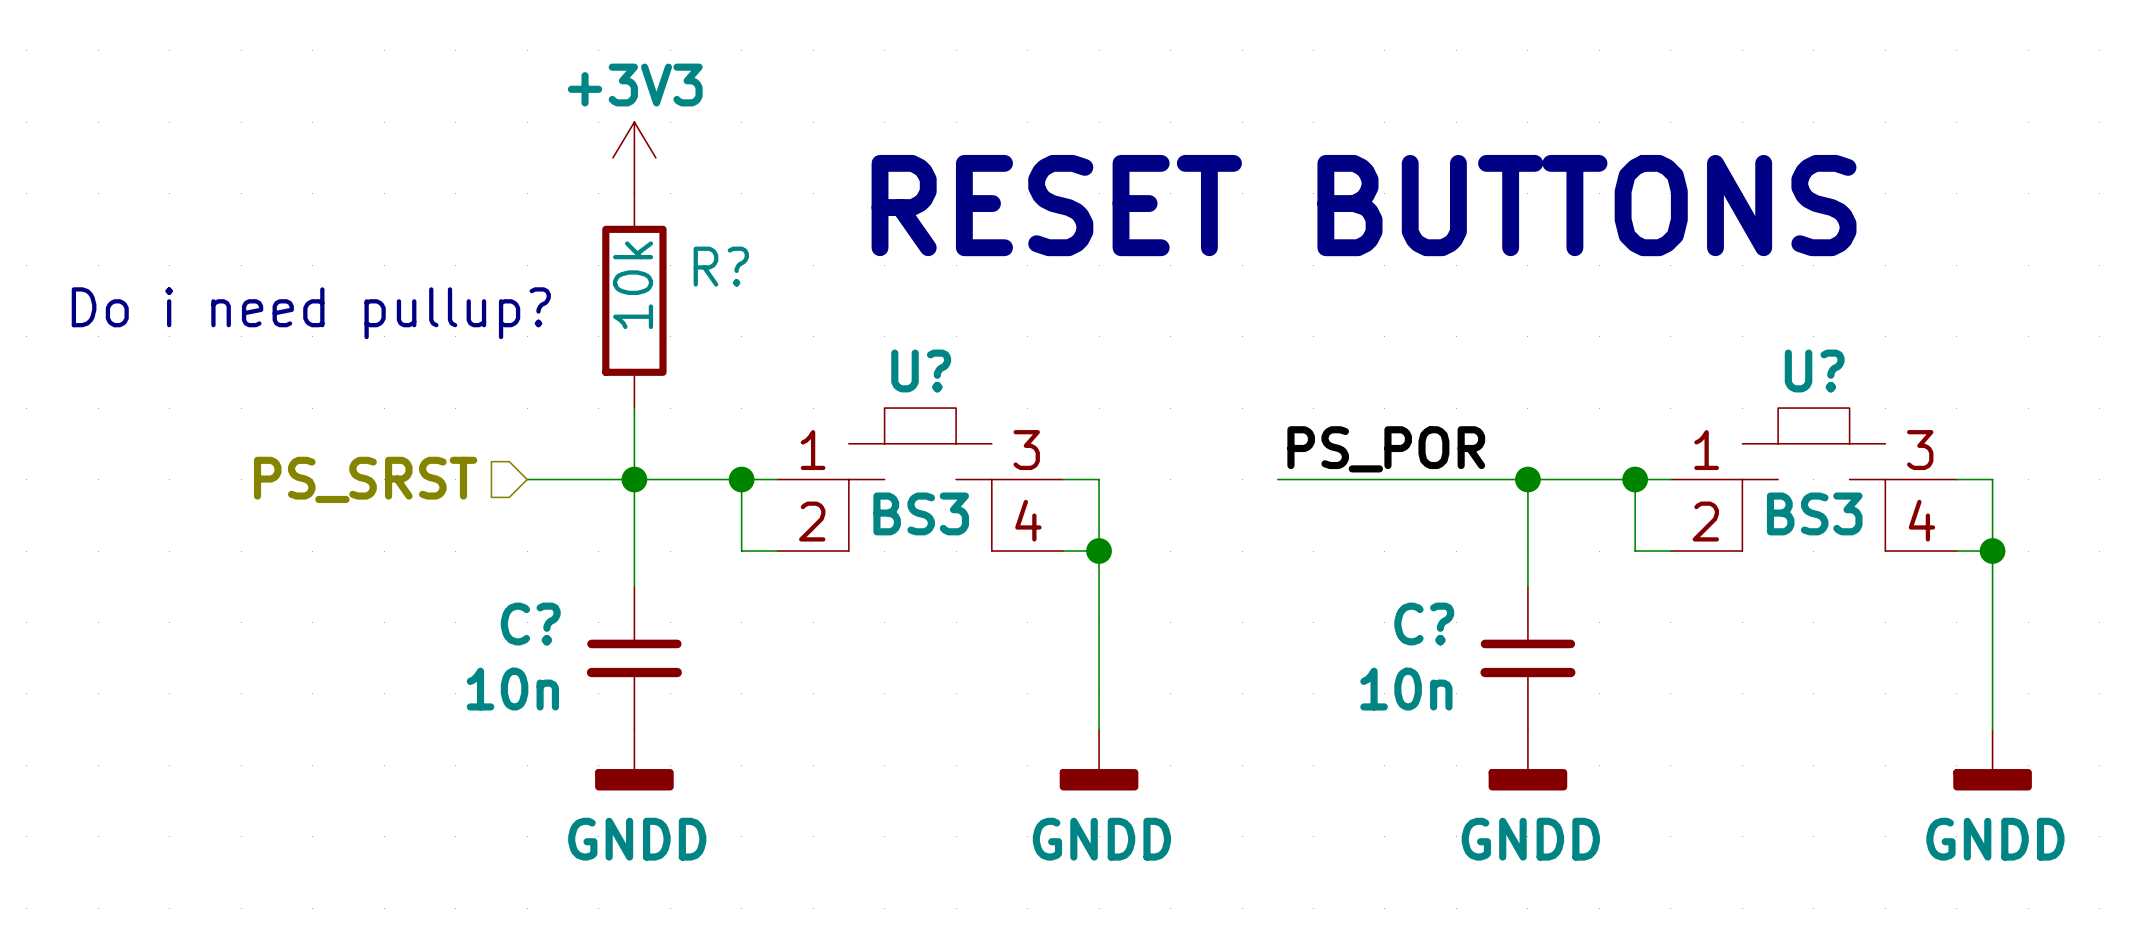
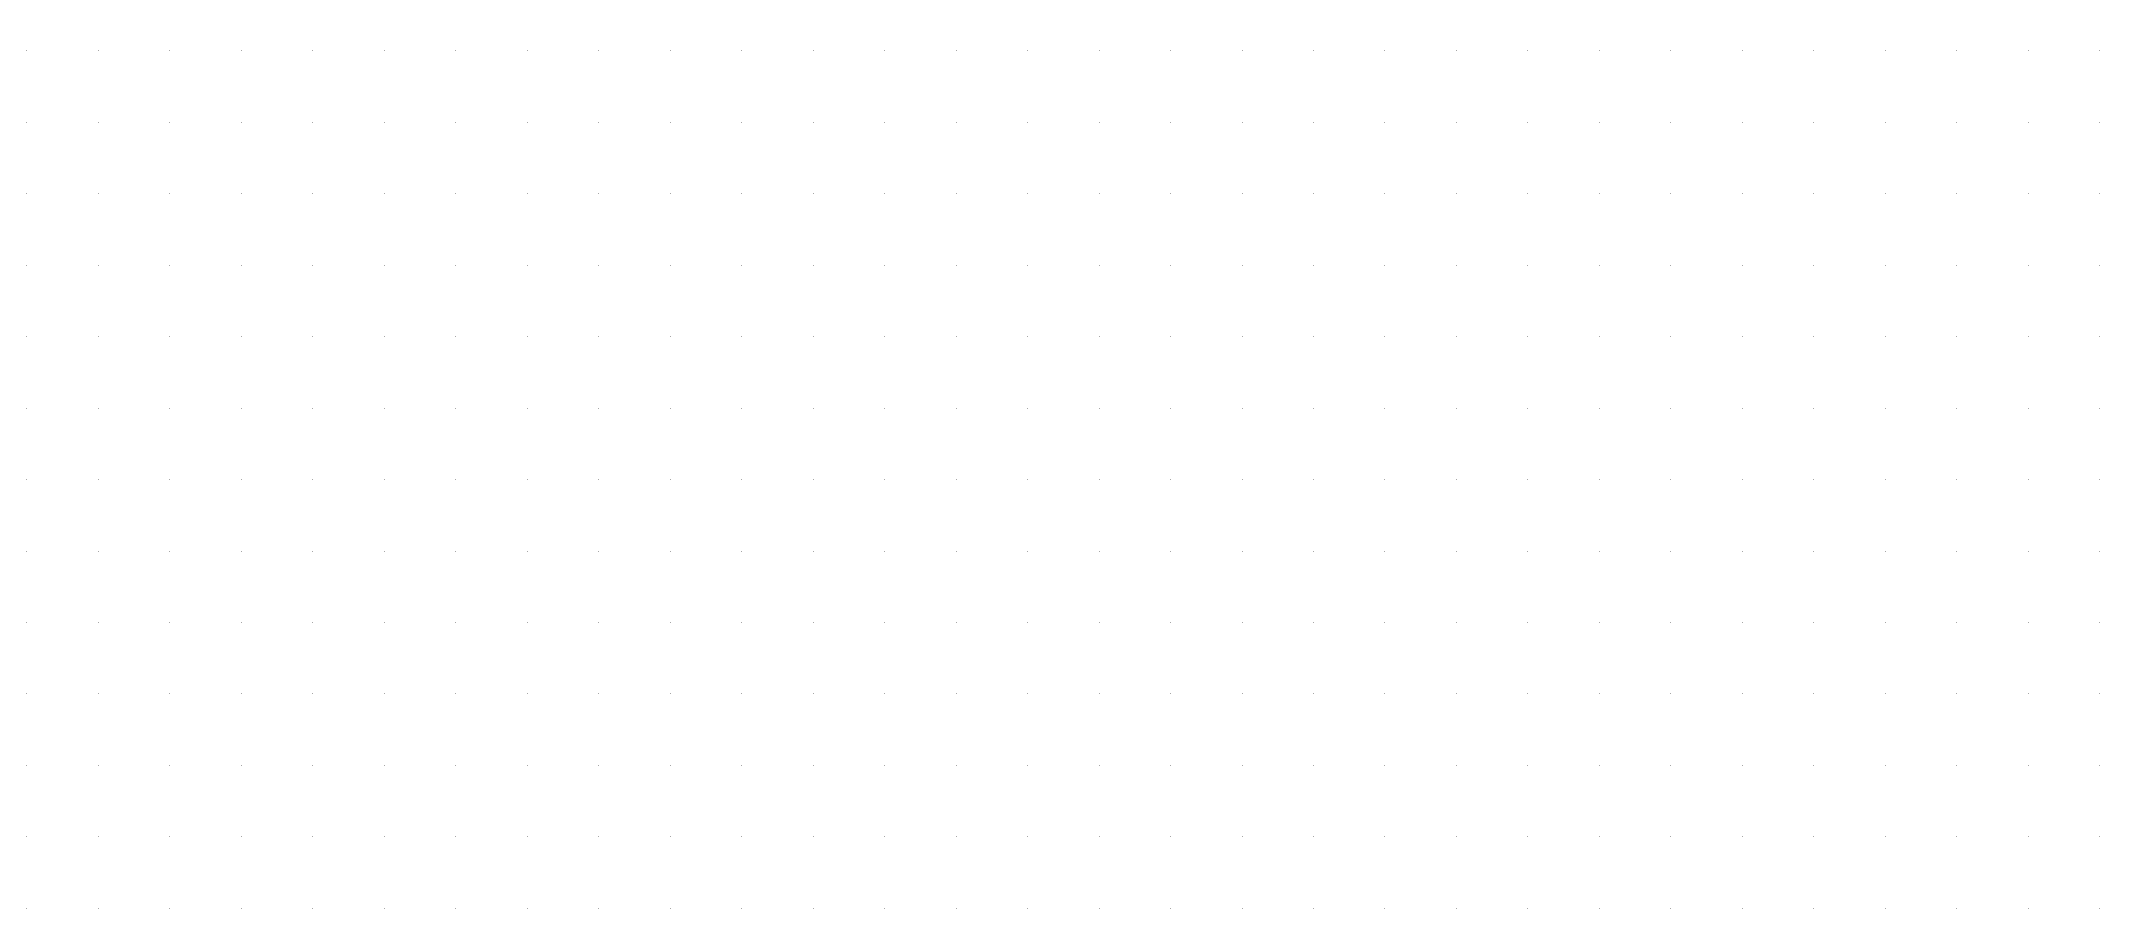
power symbol: +3V3 (634, 157) -> none
text: RESET BUTTONS (1364, 205) -> none
R?: 10k (634, 300) -> none
text: Do i need pullup? (311, 313) -> none
wire: (634, 408) (634, 586) -> none
label: PS_POR (1386, 449) -> none
hierarchical label: PS_SRST (365, 479) -> none
wire: (527, 479) (777, 479) -> none
junction: (634, 479) -> none
wire: (741, 479) (741, 551) (777, 551) -> none
junction: (741, 479) -> none
U?: BS3 (920, 479) -> none
wire: (1063, 479) (1099, 479) (1099, 729) -> none
wire: (1277, 479) (1670, 479) -> none
wire: (1527, 479) (1527, 586) -> none
junction: (1527, 479) -> none
wire: (1635, 479) (1635, 551) (1670, 551) -> none
junction: (1635, 479) -> none
U?: BS3 (1813, 479) -> none
wire: (1956, 479) (1992, 479) (1992, 729) -> none
wire: (1063, 551) (1099, 551) -> none
junction: (1099, 551) -> none
wire: (1956, 551) (1992, 551) -> none
junction: (1992, 551) -> none
C?: 10n (634, 658) -> none
C?: 10n (1527, 658) -> none
power symbol: GNDD (634, 760) -> none
power symbol: GNDD (1099, 760) -> none
power symbol: GNDD (1527, 760) -> none
power symbol: GNDD (1992, 760) -> none

